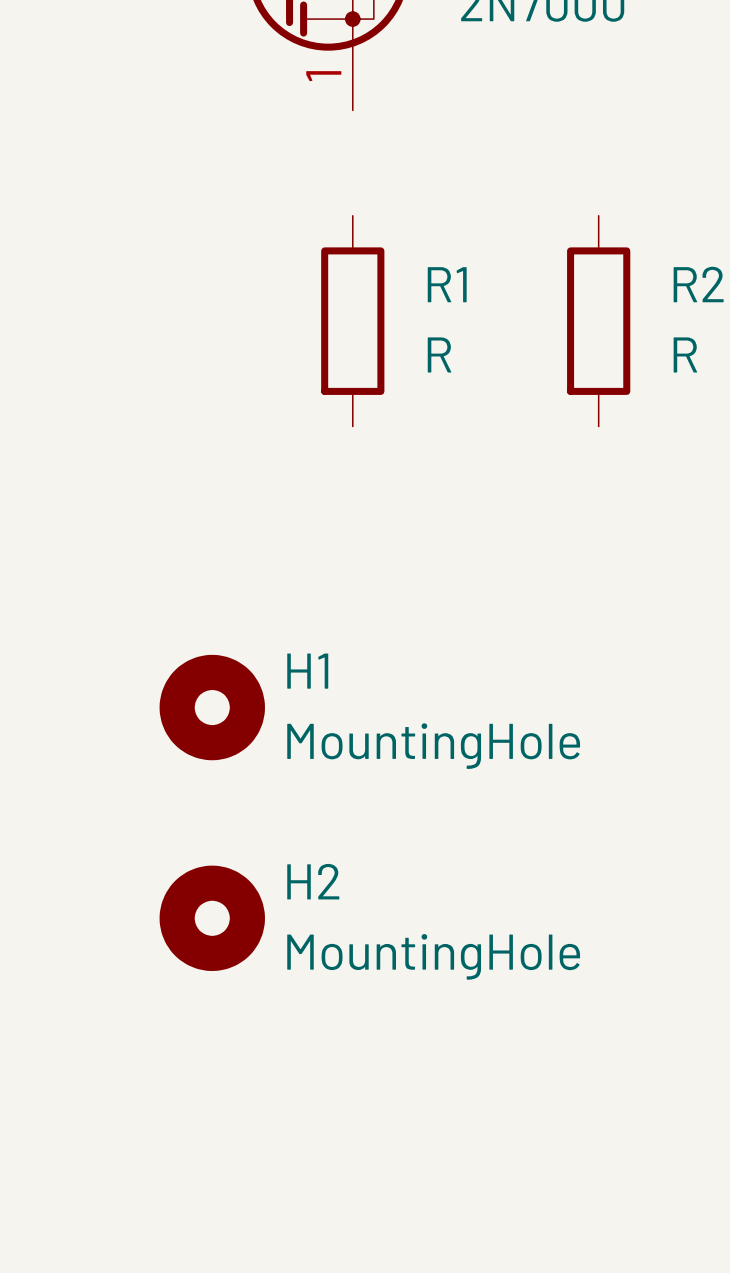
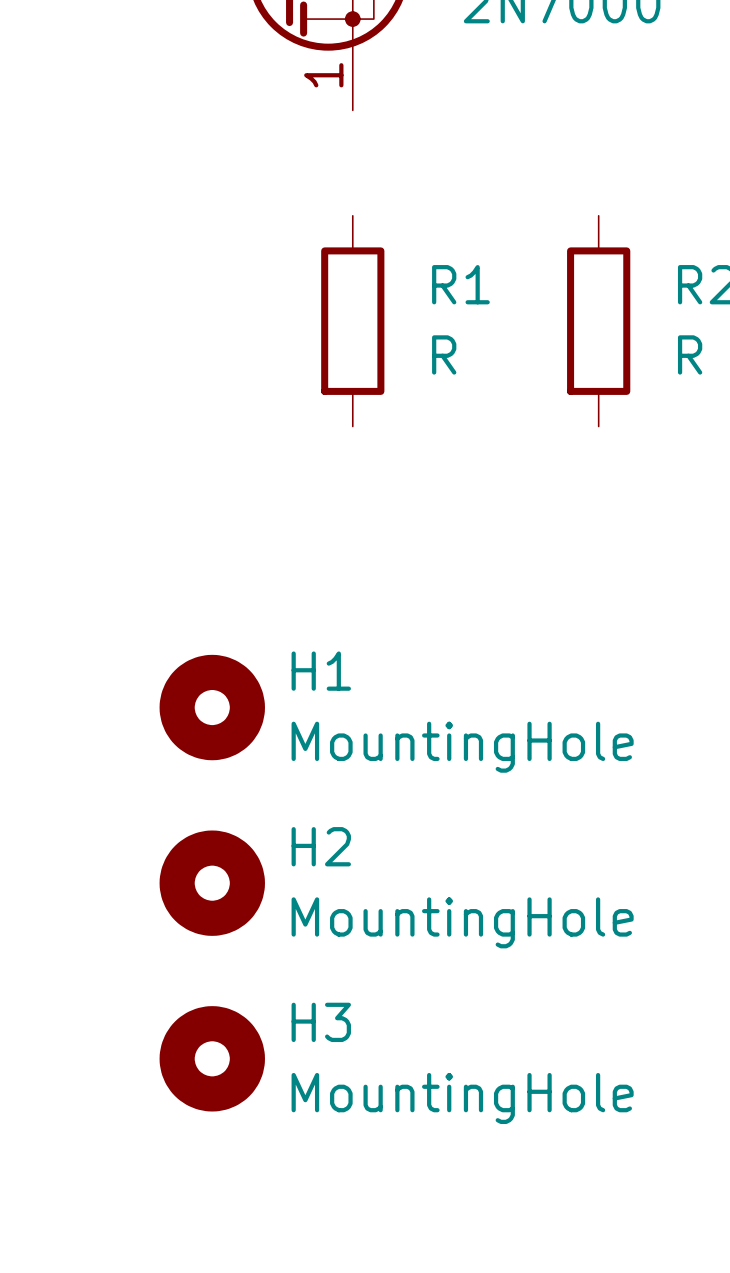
H2 position: (212, 918) -> (212, 883)
H3: none -> MountingHole (212, 1058)

